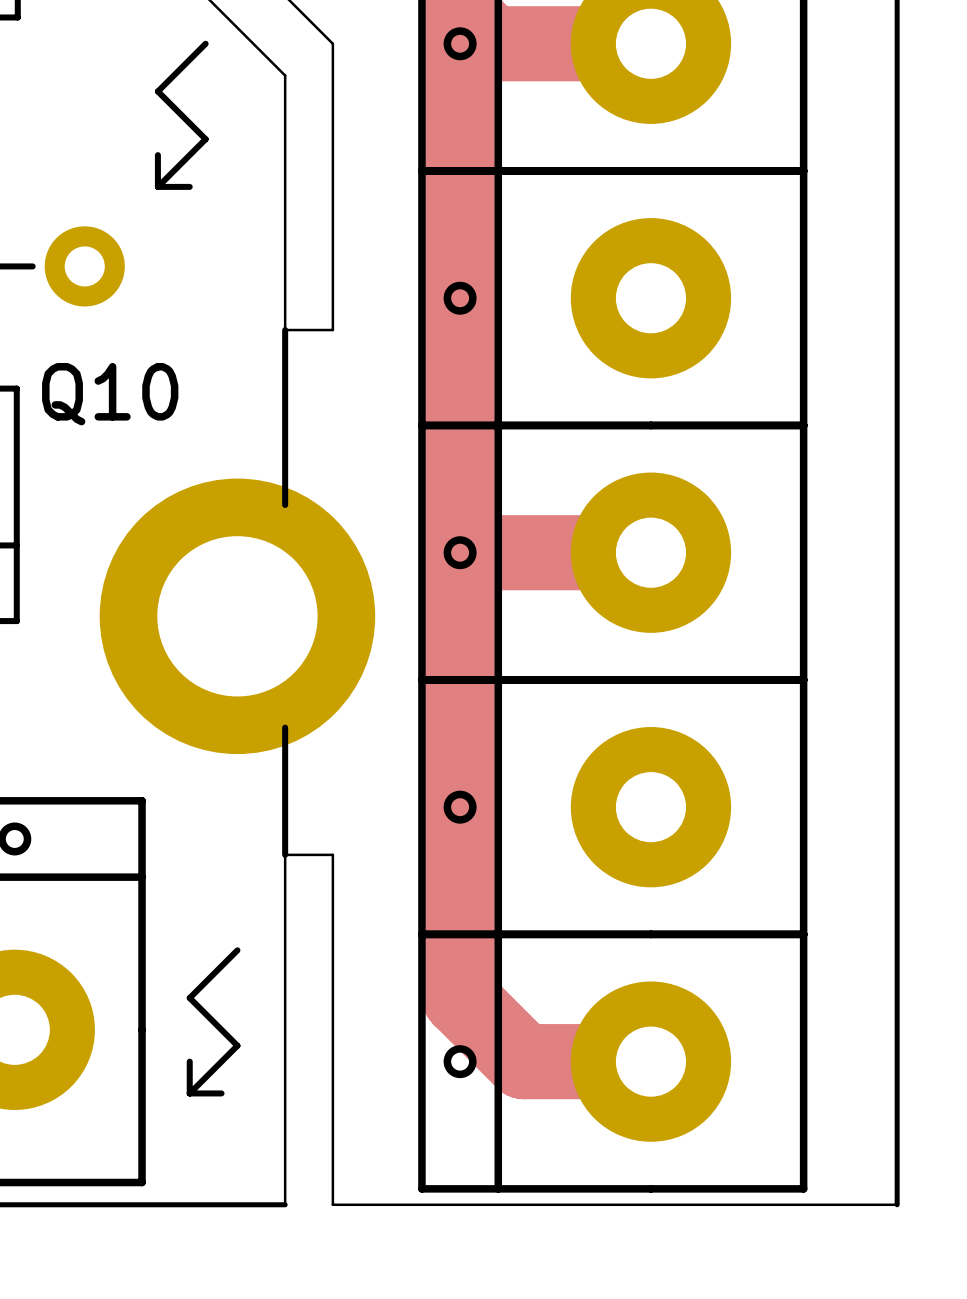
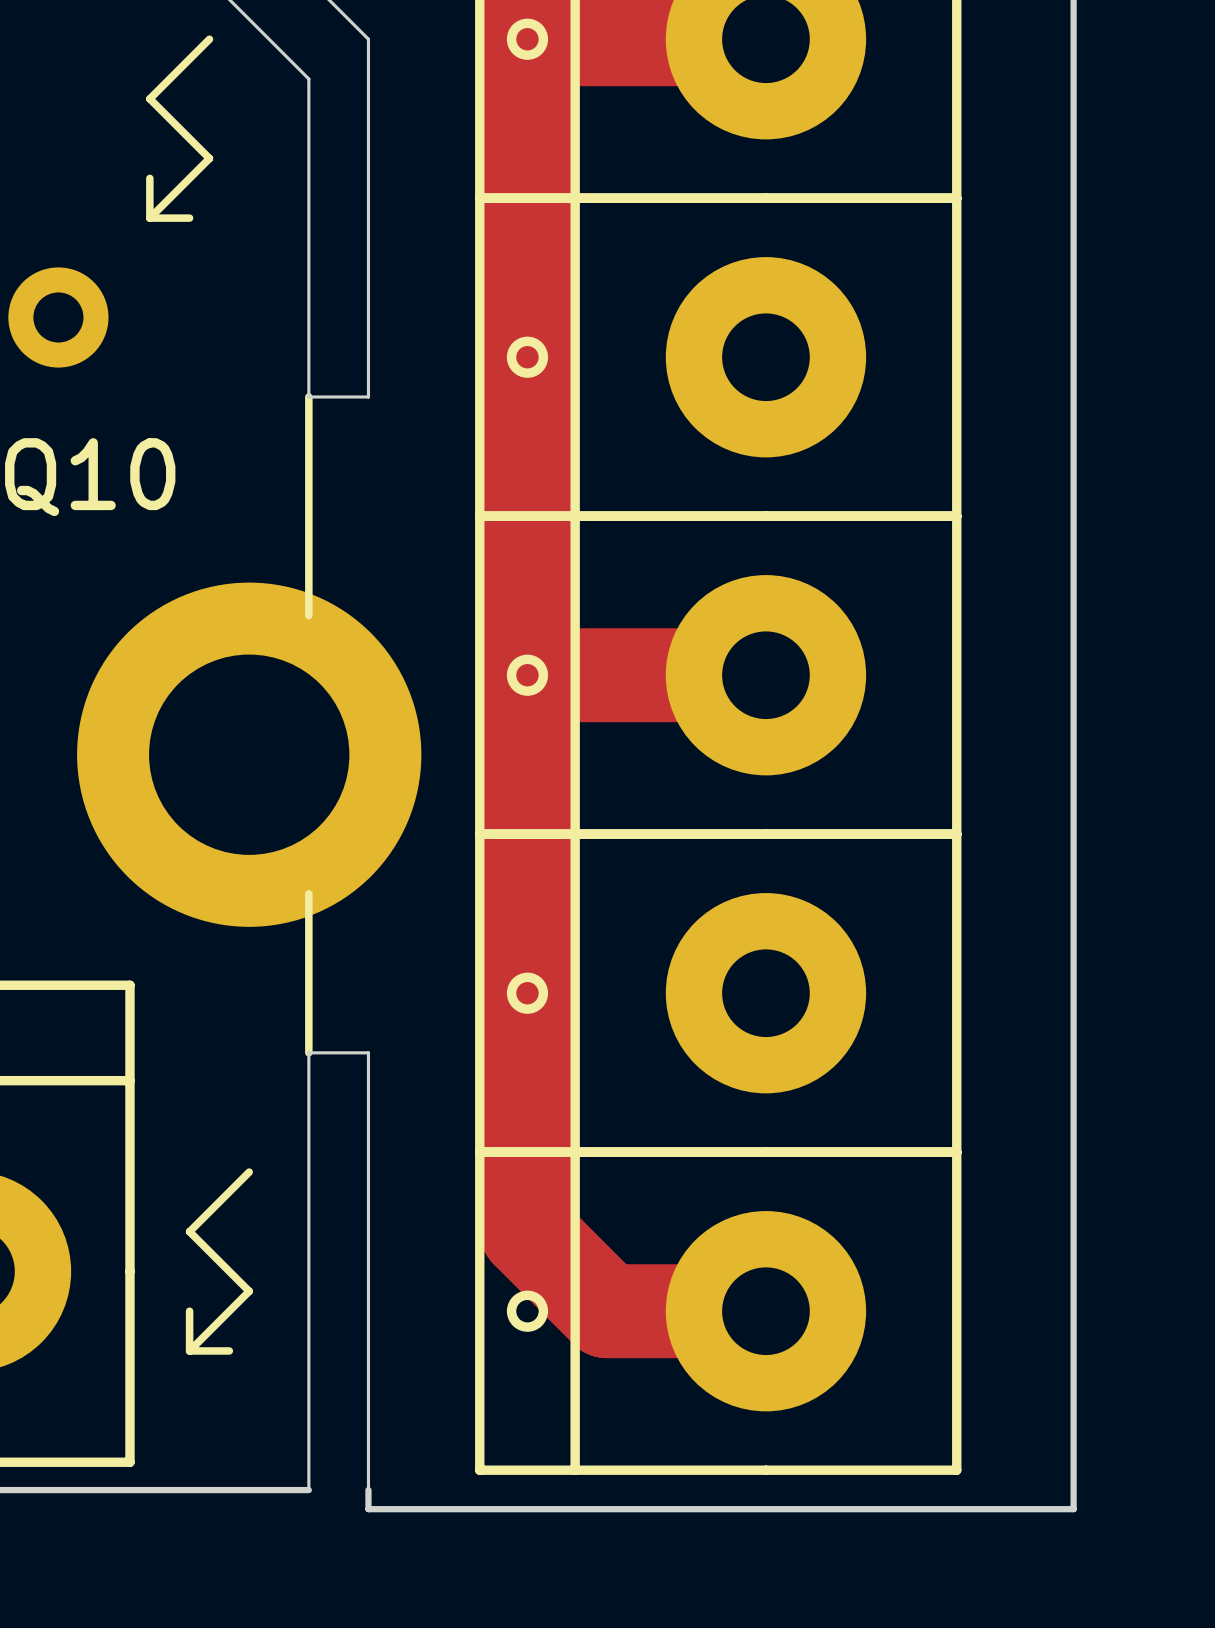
board edge: (332, 1204) (897, 1204) -> (368, 1490) (368, 1509) (1073, 1509) (1073, 1490)

